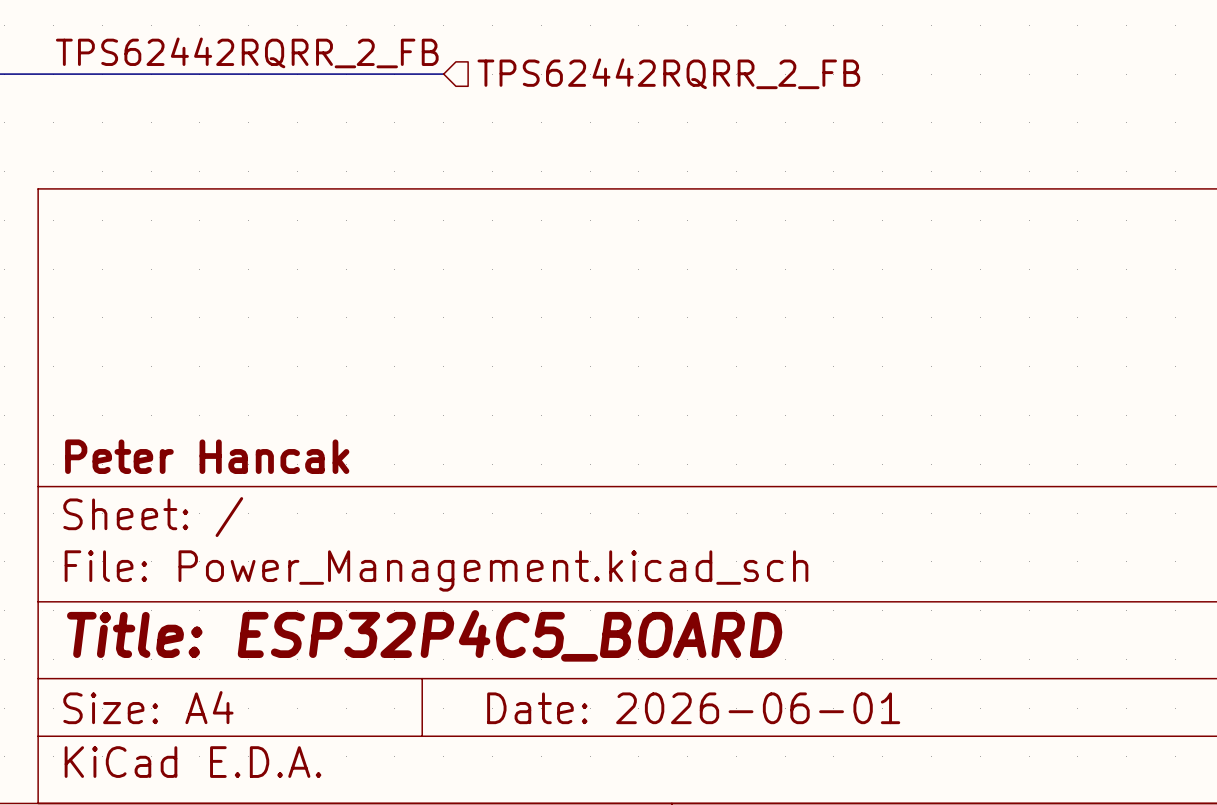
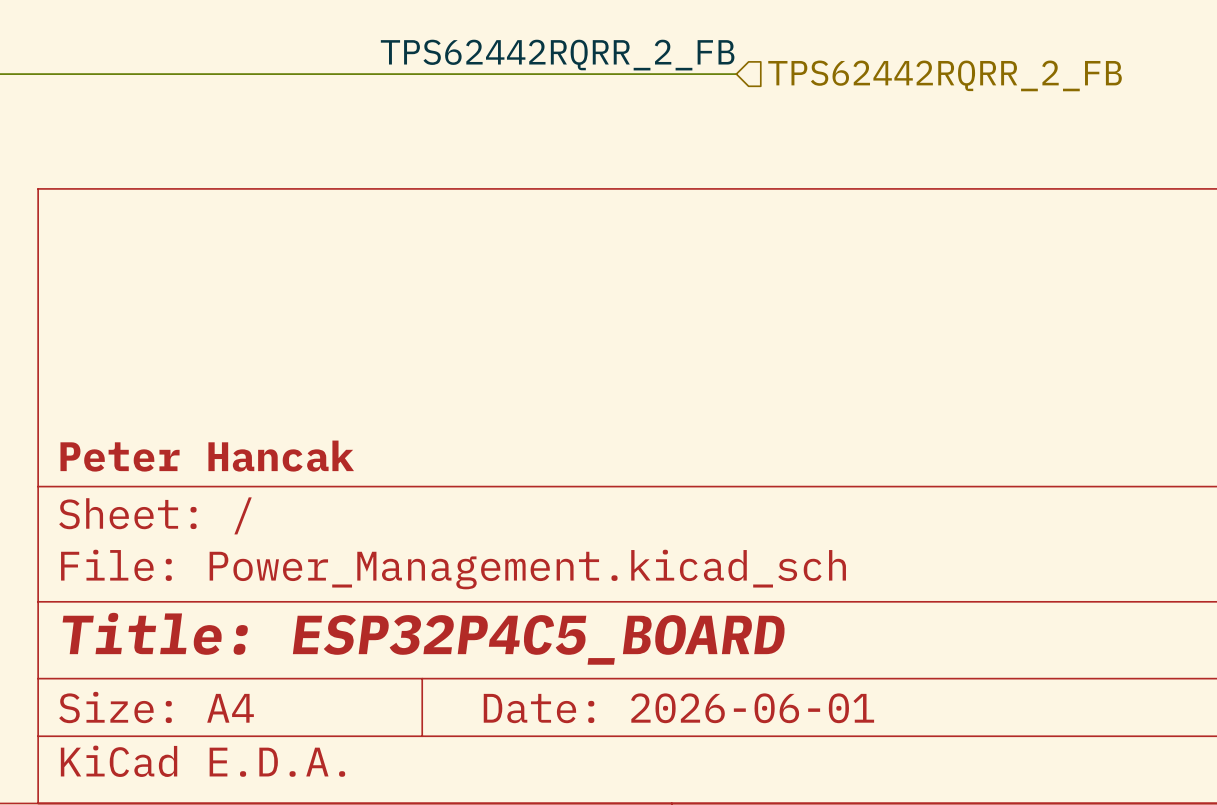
label position: TPS62442RQRR_2_FB (247, 52) -> TPS62442RQRR_2_FB (557, 55)
hierarchical label position: TPS62442RQRR_2_FB (668, 73) -> TPS62442RQRR_2_FB (945, 75)
wire: none -> (443, 74) (736, 74)

